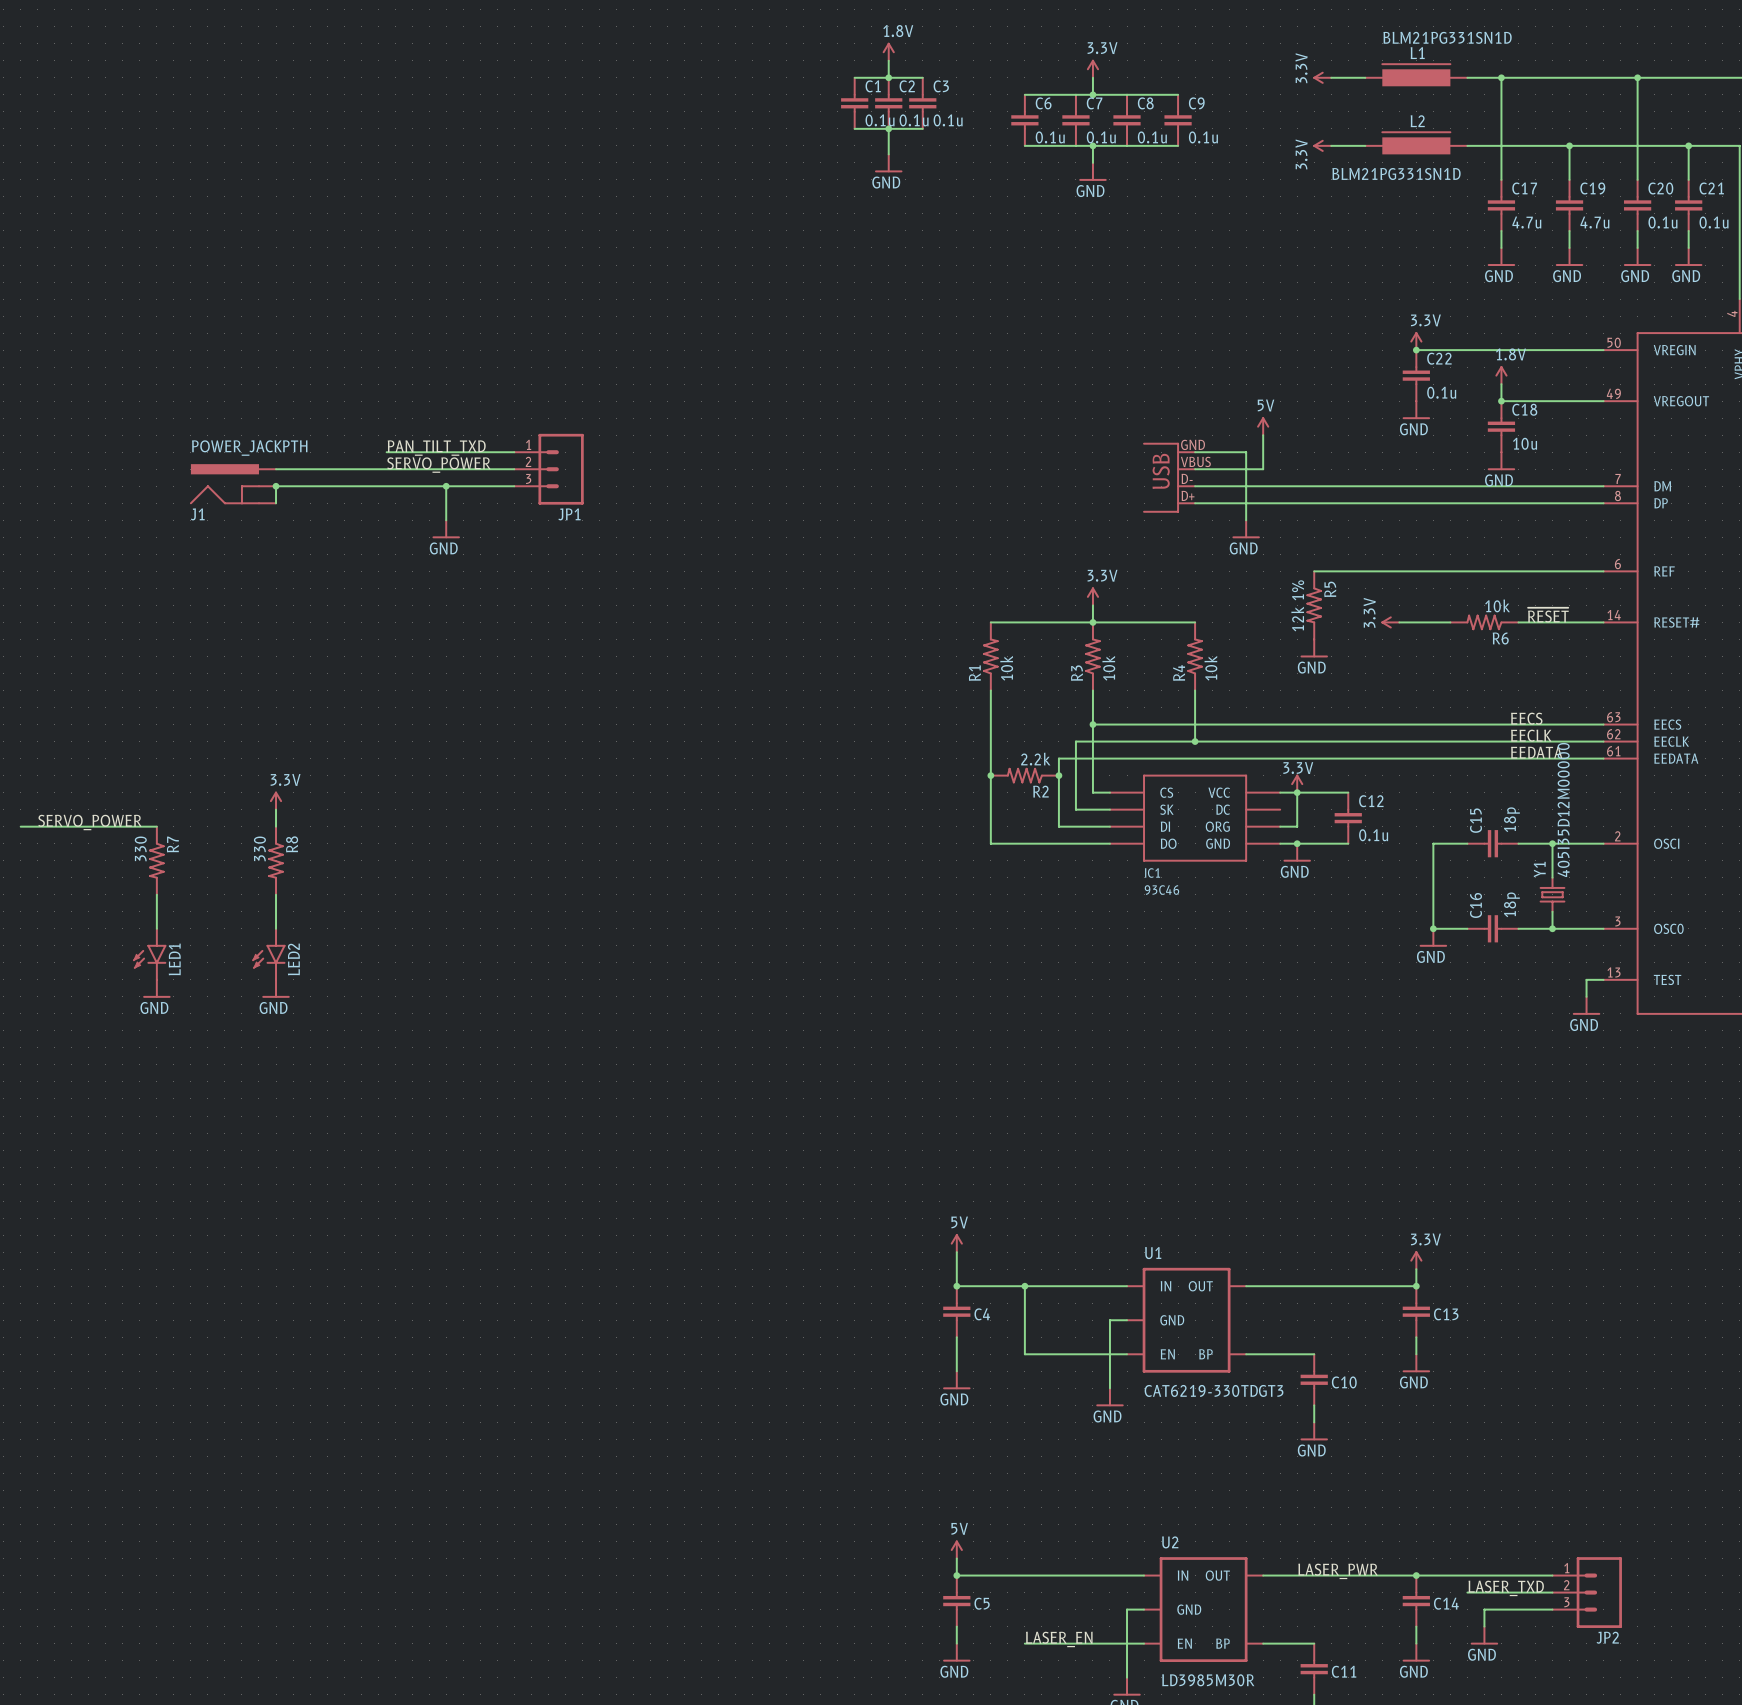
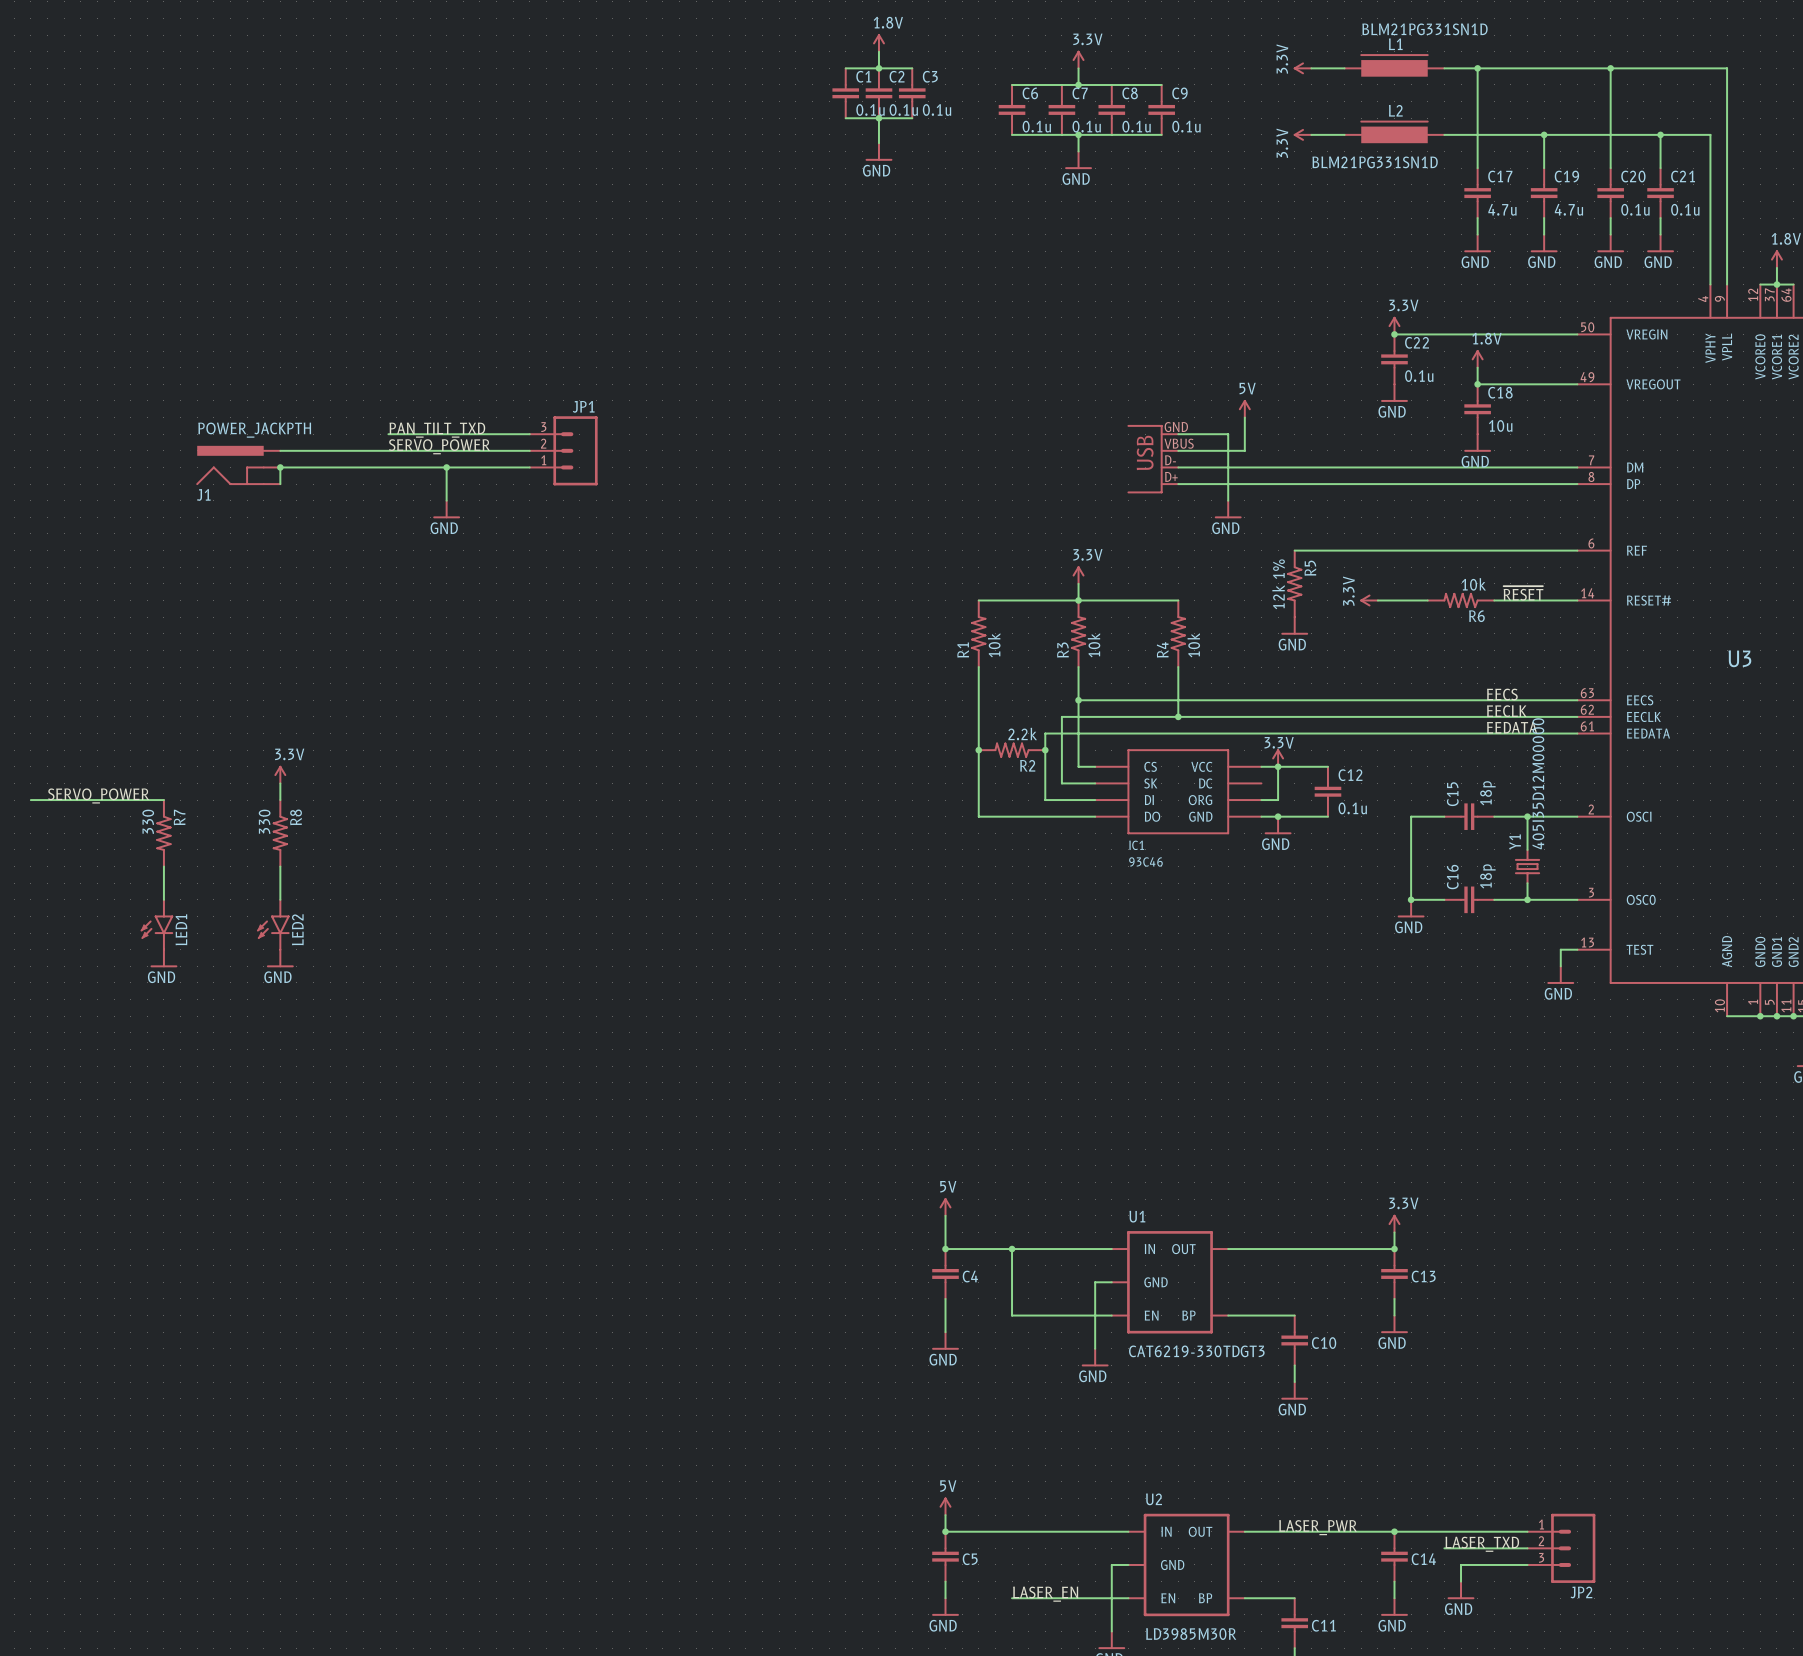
JP1 flip: as is (561, 469) -> up-down (575, 450)

